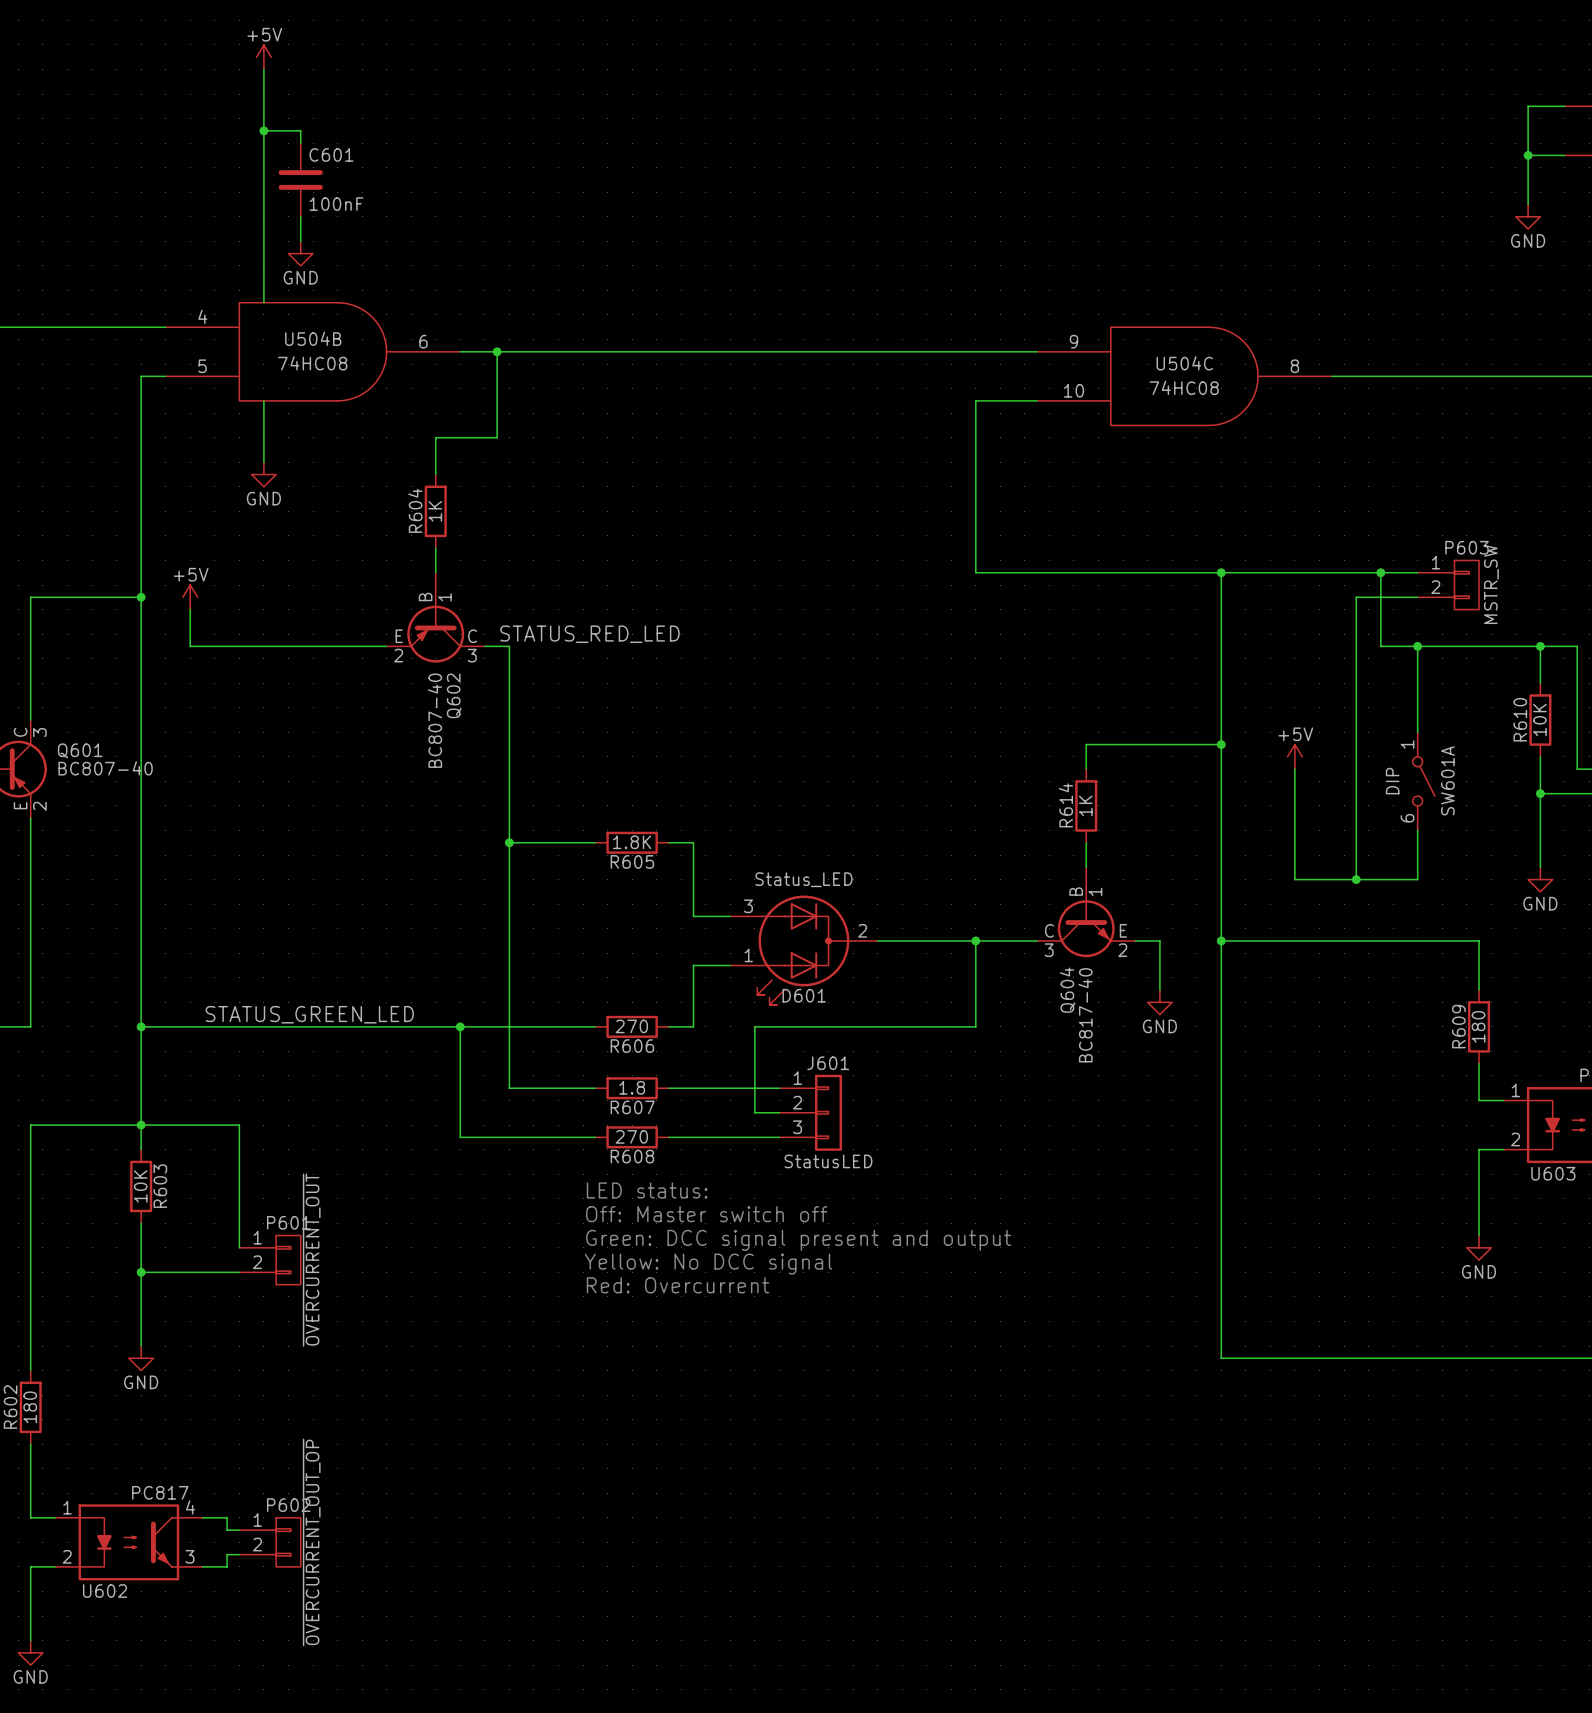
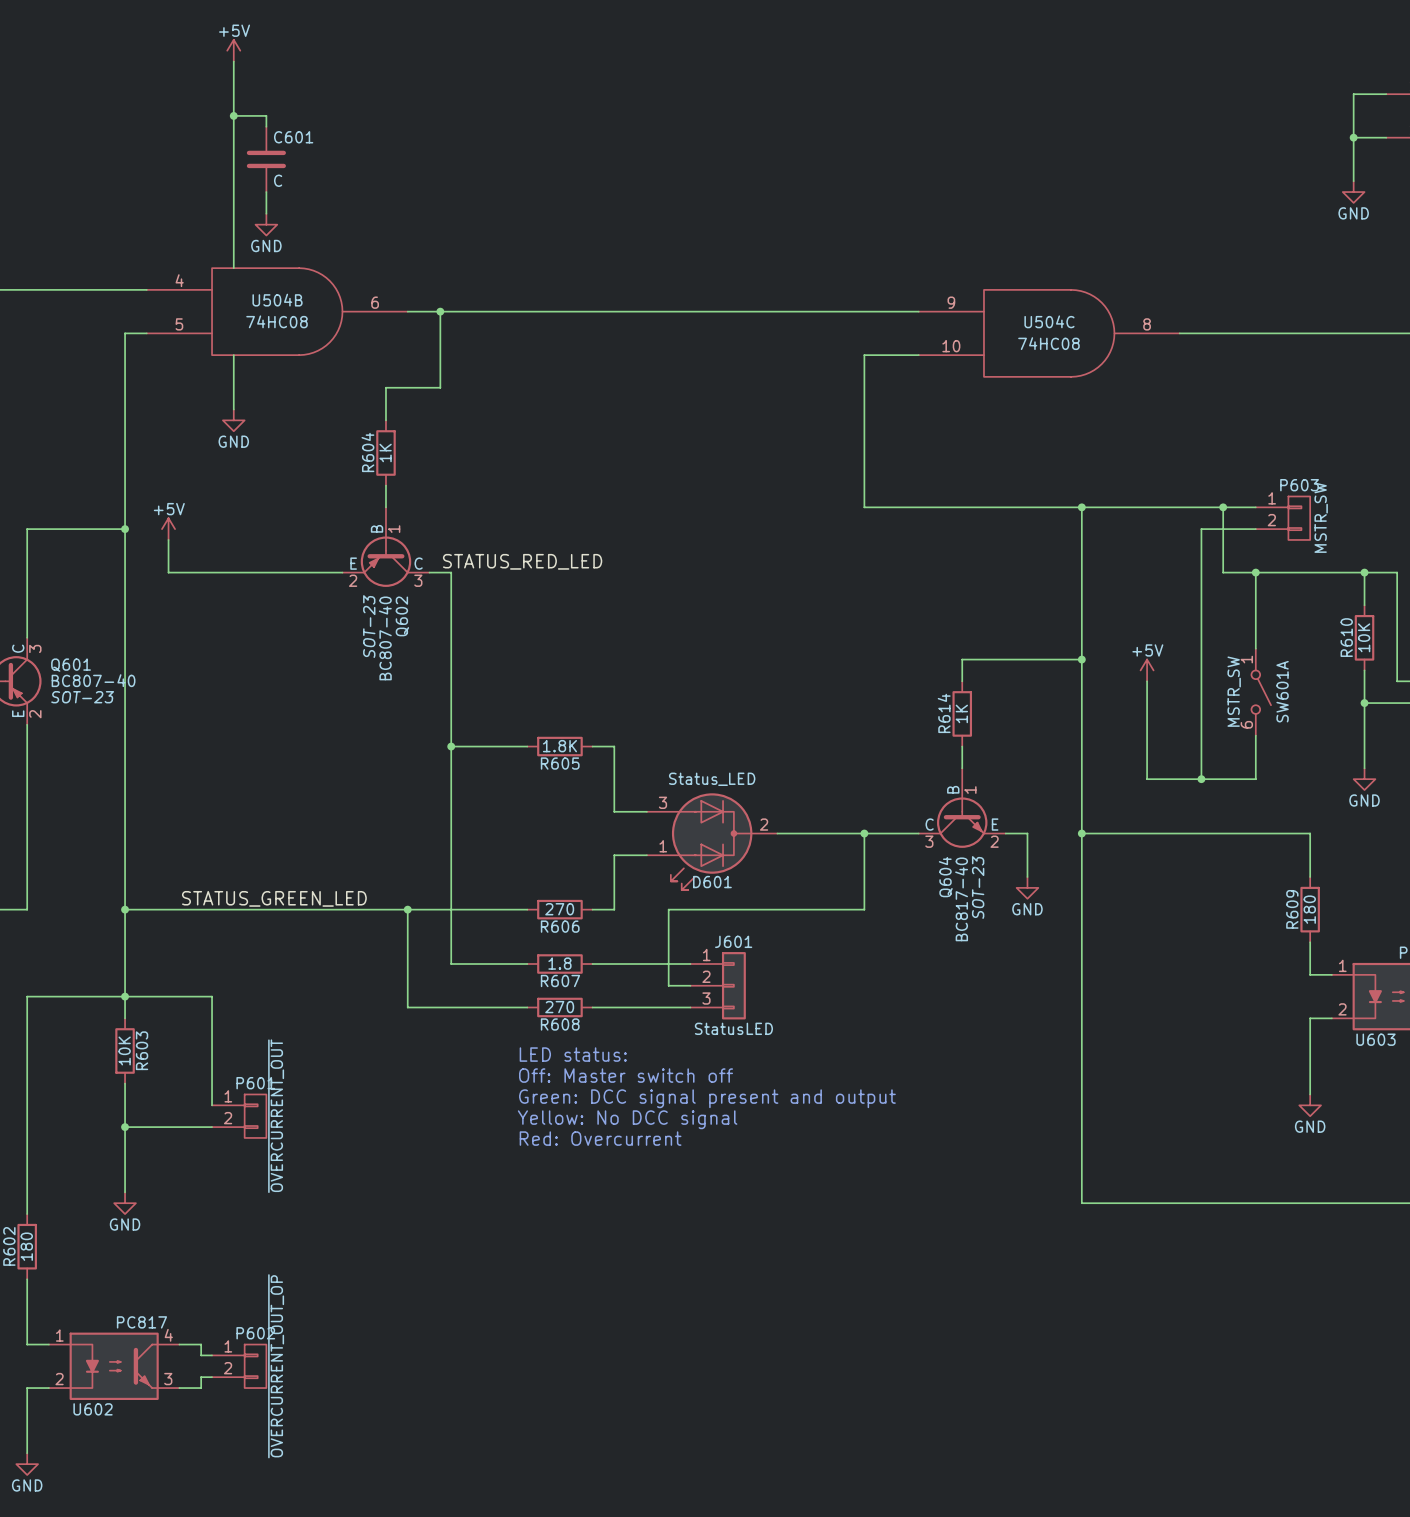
C601 value: 100nF (336, 204) -> C (278, 180)
Q602 text: none -> SOT-23 (369, 626)
SW601A value: DIP (1392, 781) -> MSTR_SW (1234, 691)
Q601 text: none -> SOT-23 (82, 697)
Q604 text: none -> SOT-23 (978, 887)

